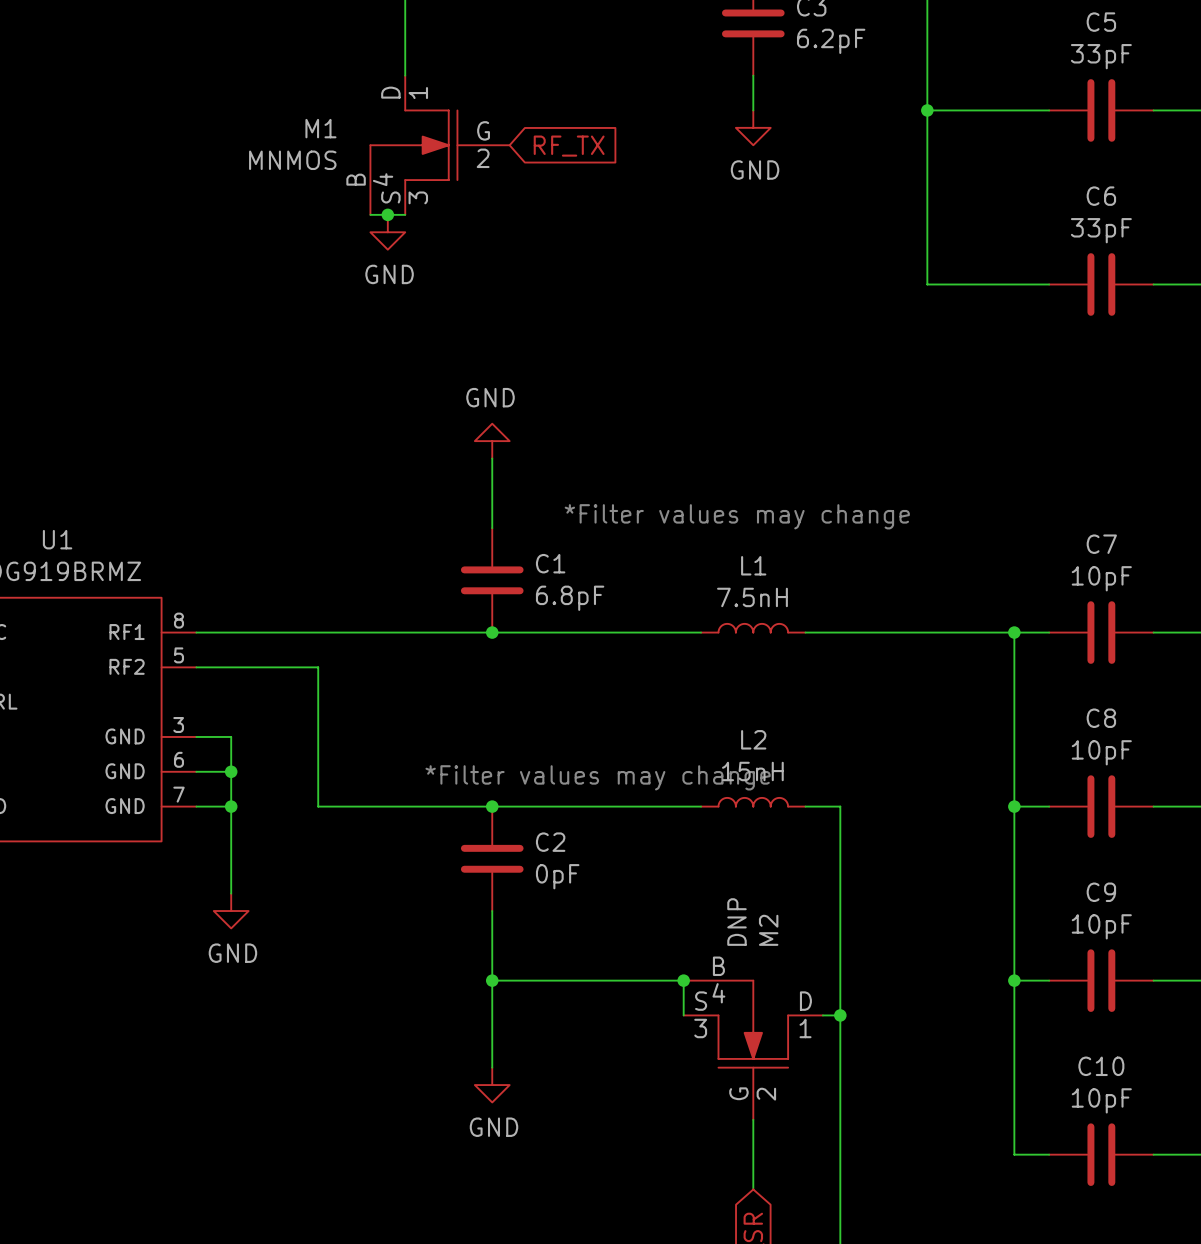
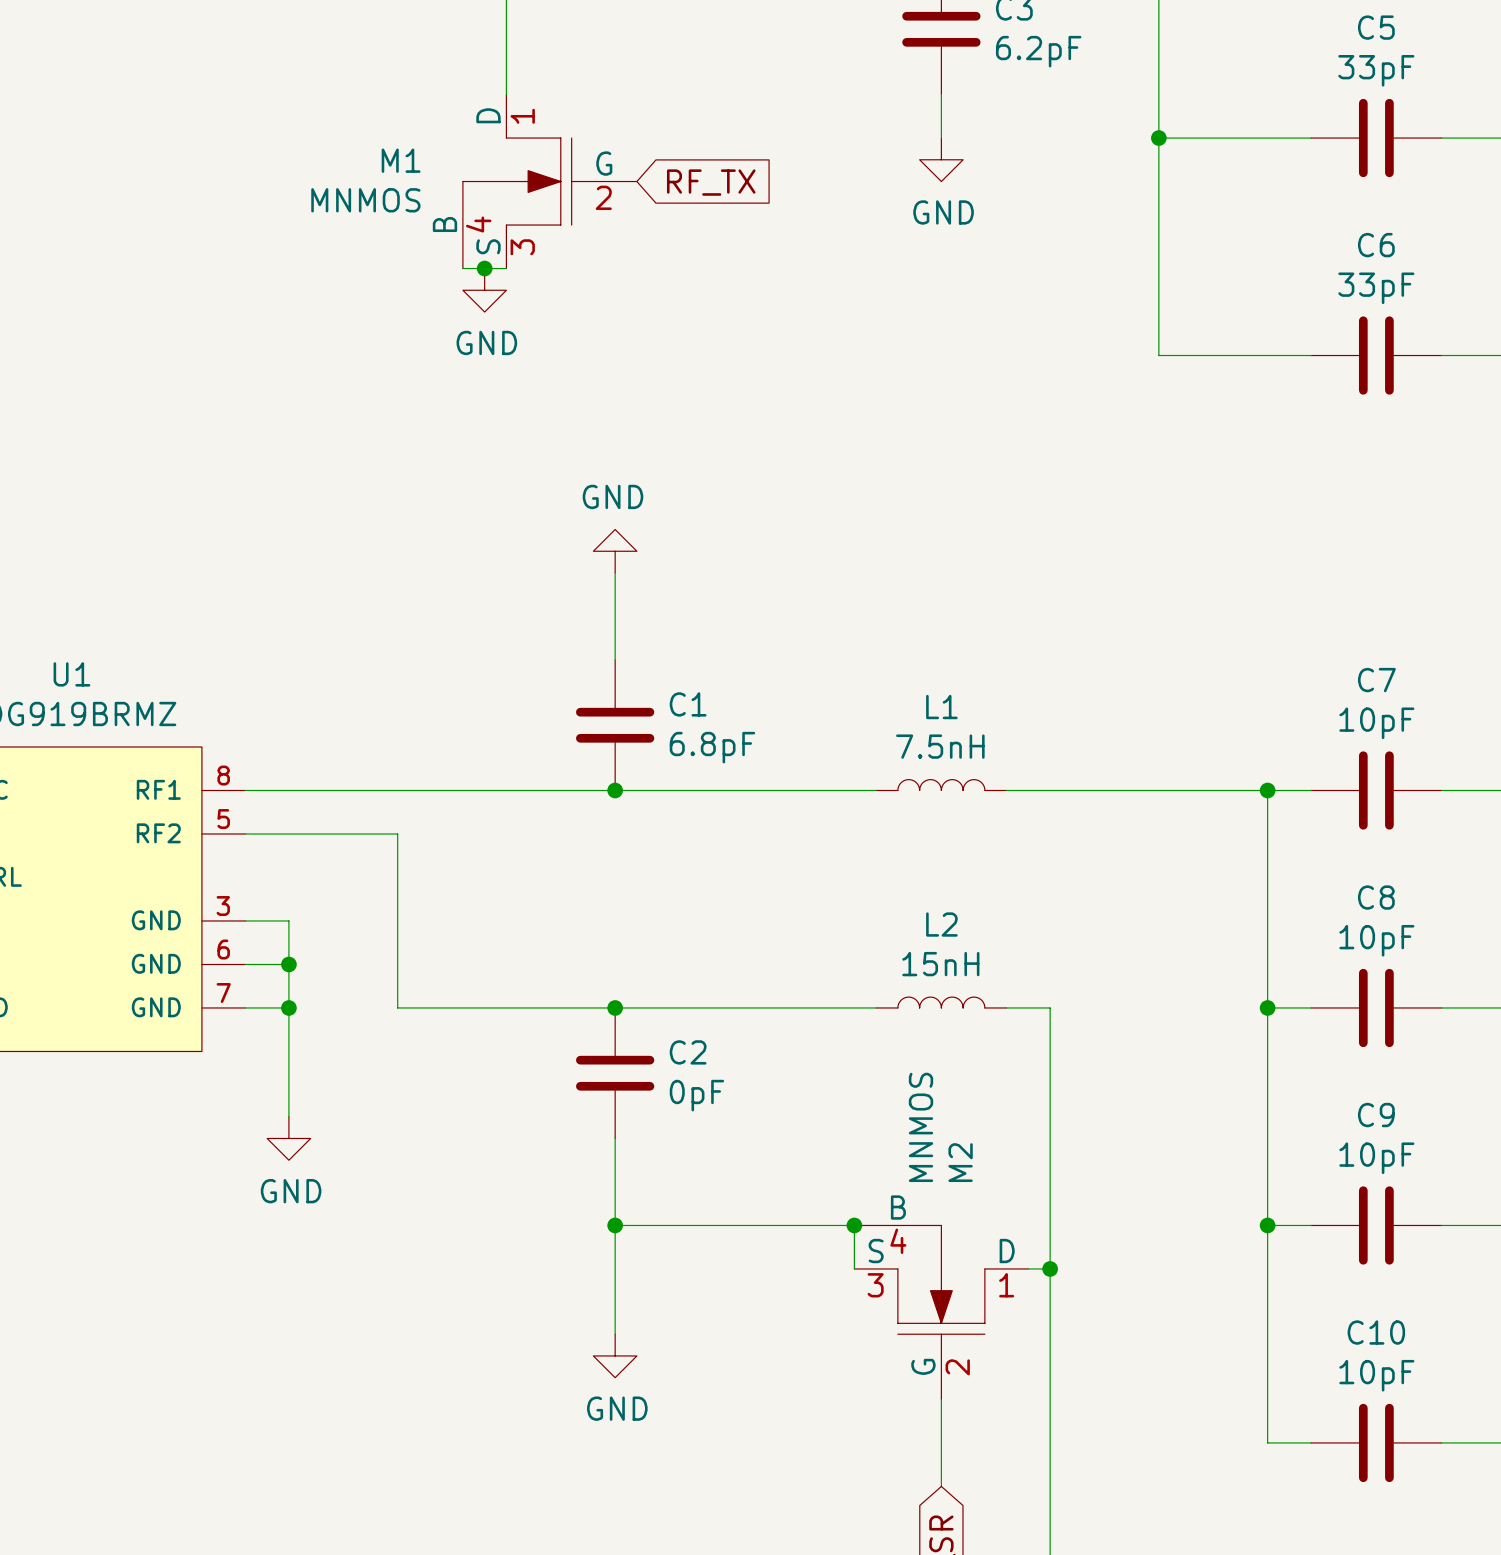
text: *Filter values may change (737, 516) -> none
text: *Filter values may change (598, 777) -> none
M2 value: DNP (736, 922) -> MNMOS (921, 1127)

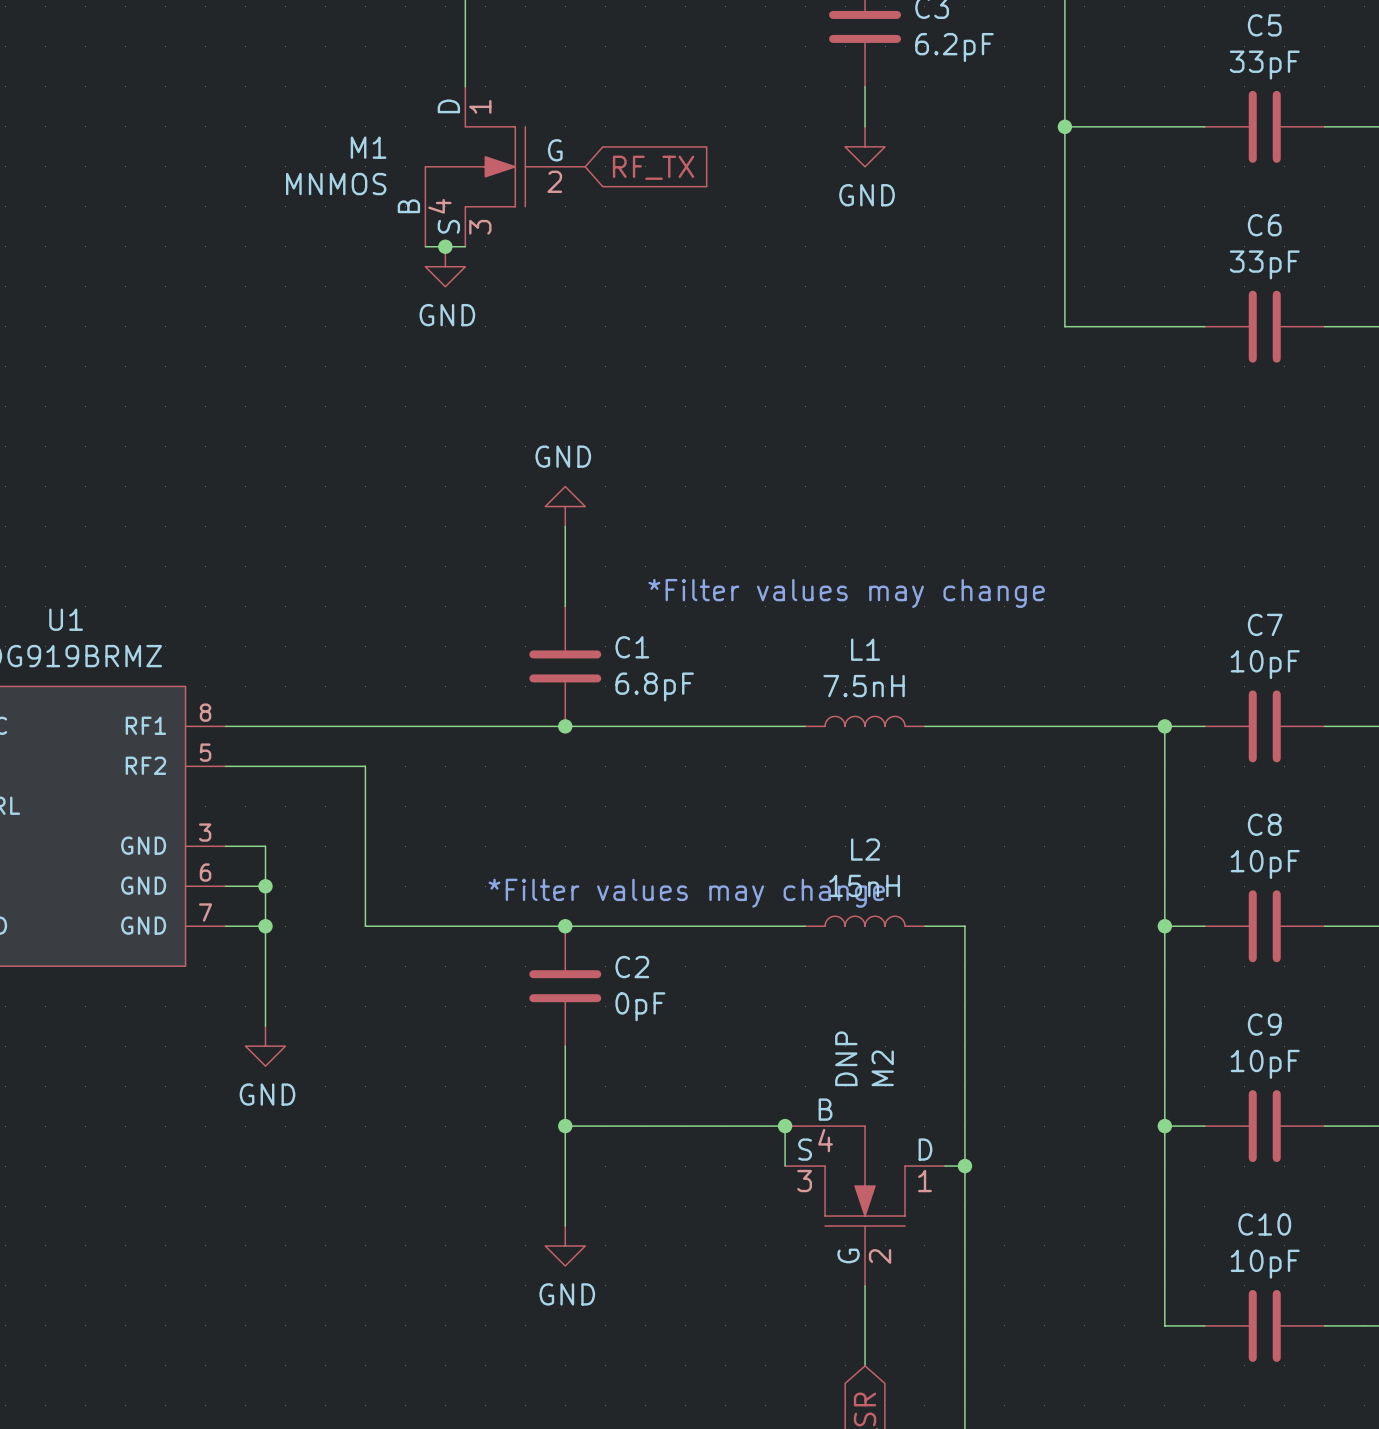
text: none -> *Filter values may change (846, 593)
text: none -> *Filter values may change (686, 893)
M2 value: MNMOS (921, 1127) -> DNP (846, 1058)

